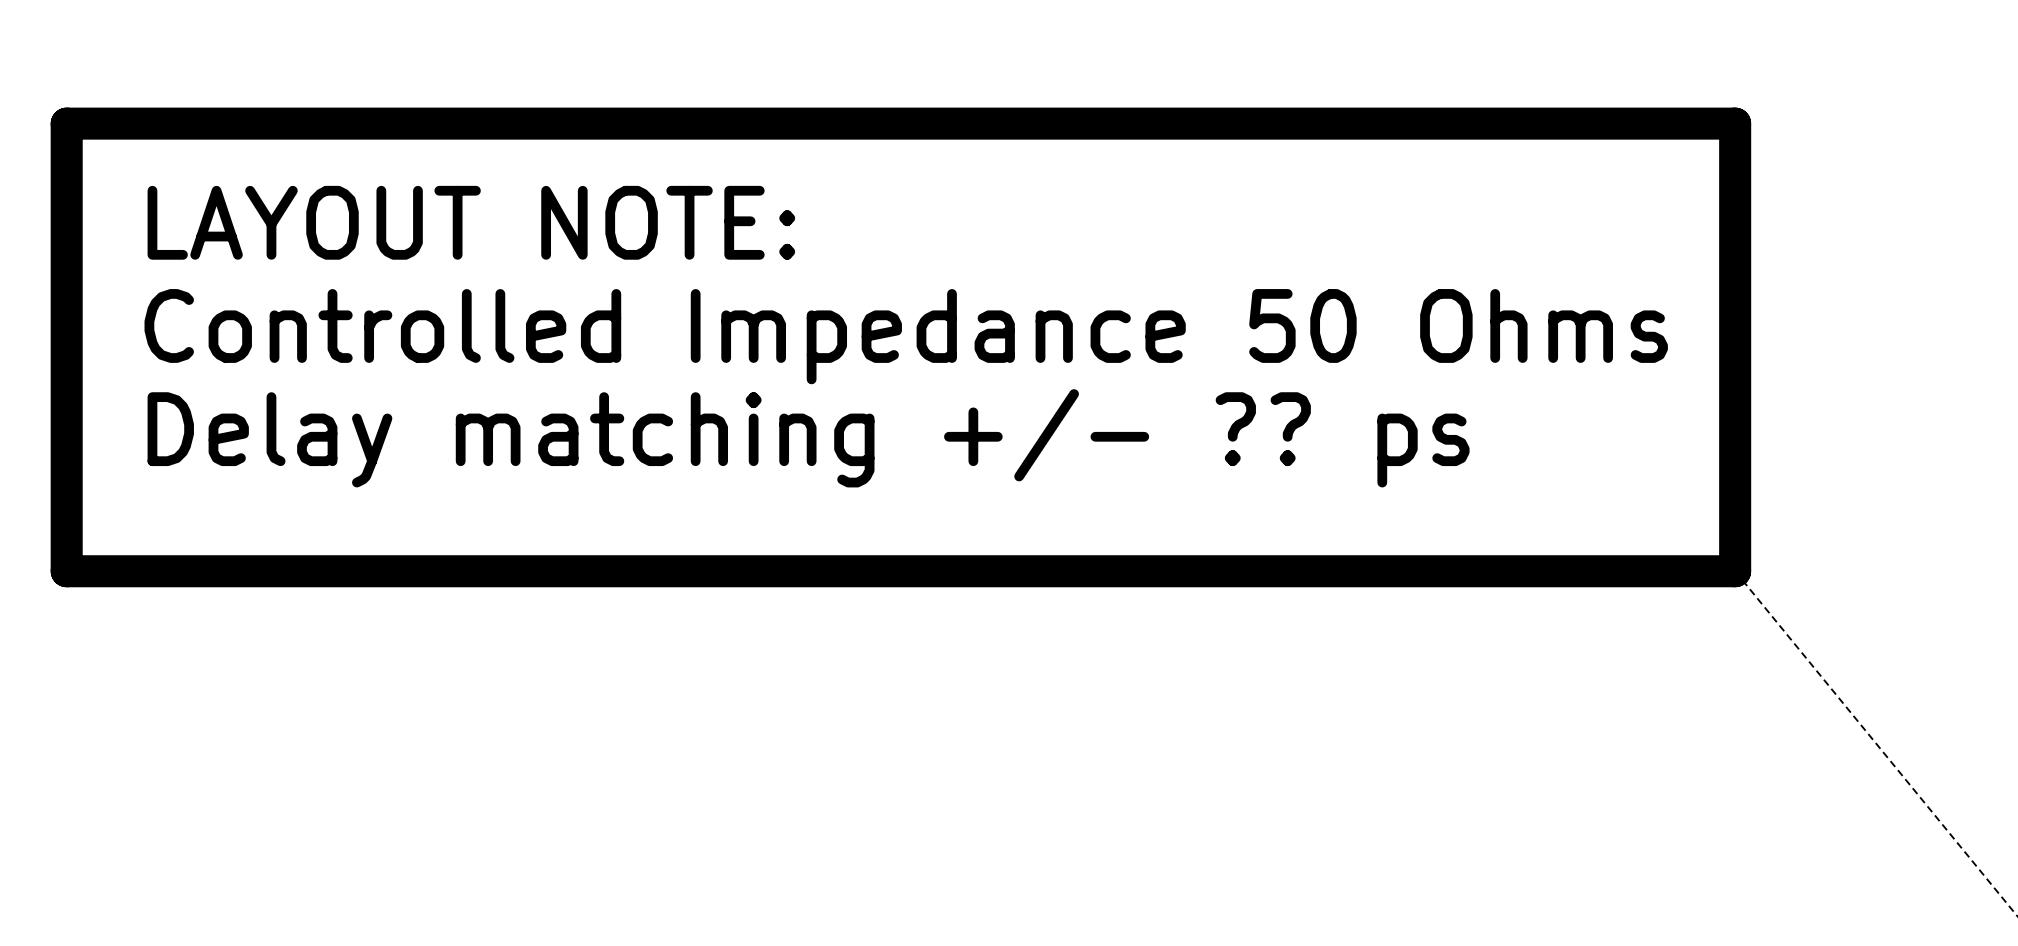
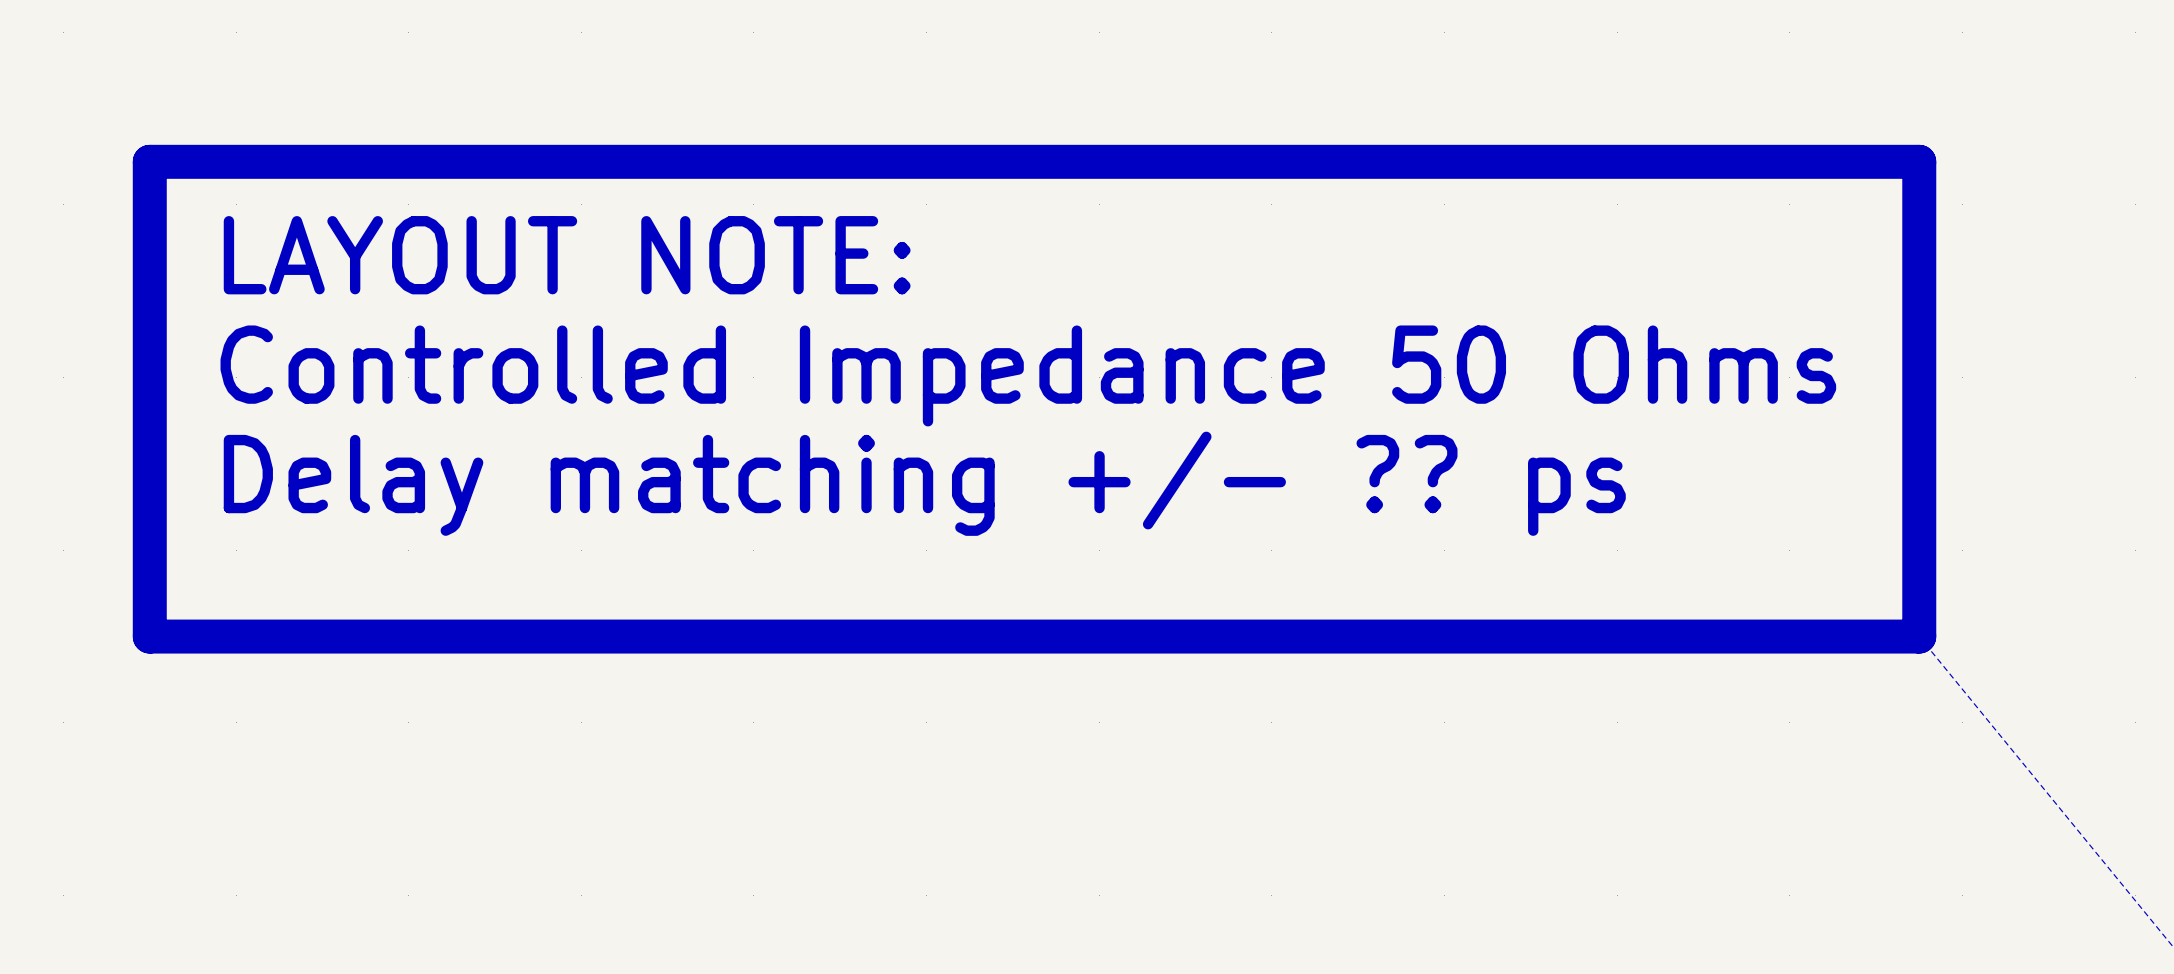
text position: LAYOUT NOTE: (471, 222) -> LAYOUT NOTE: (567, 255)
text position: Controlled Impedance 50 Ohms (906, 336) -> Controlled Impedance 50 Ohms (1028, 375)
text position: Delay matching +/- ?? ps (808, 438) -> Delay matching +/- ?? ps (924, 483)

